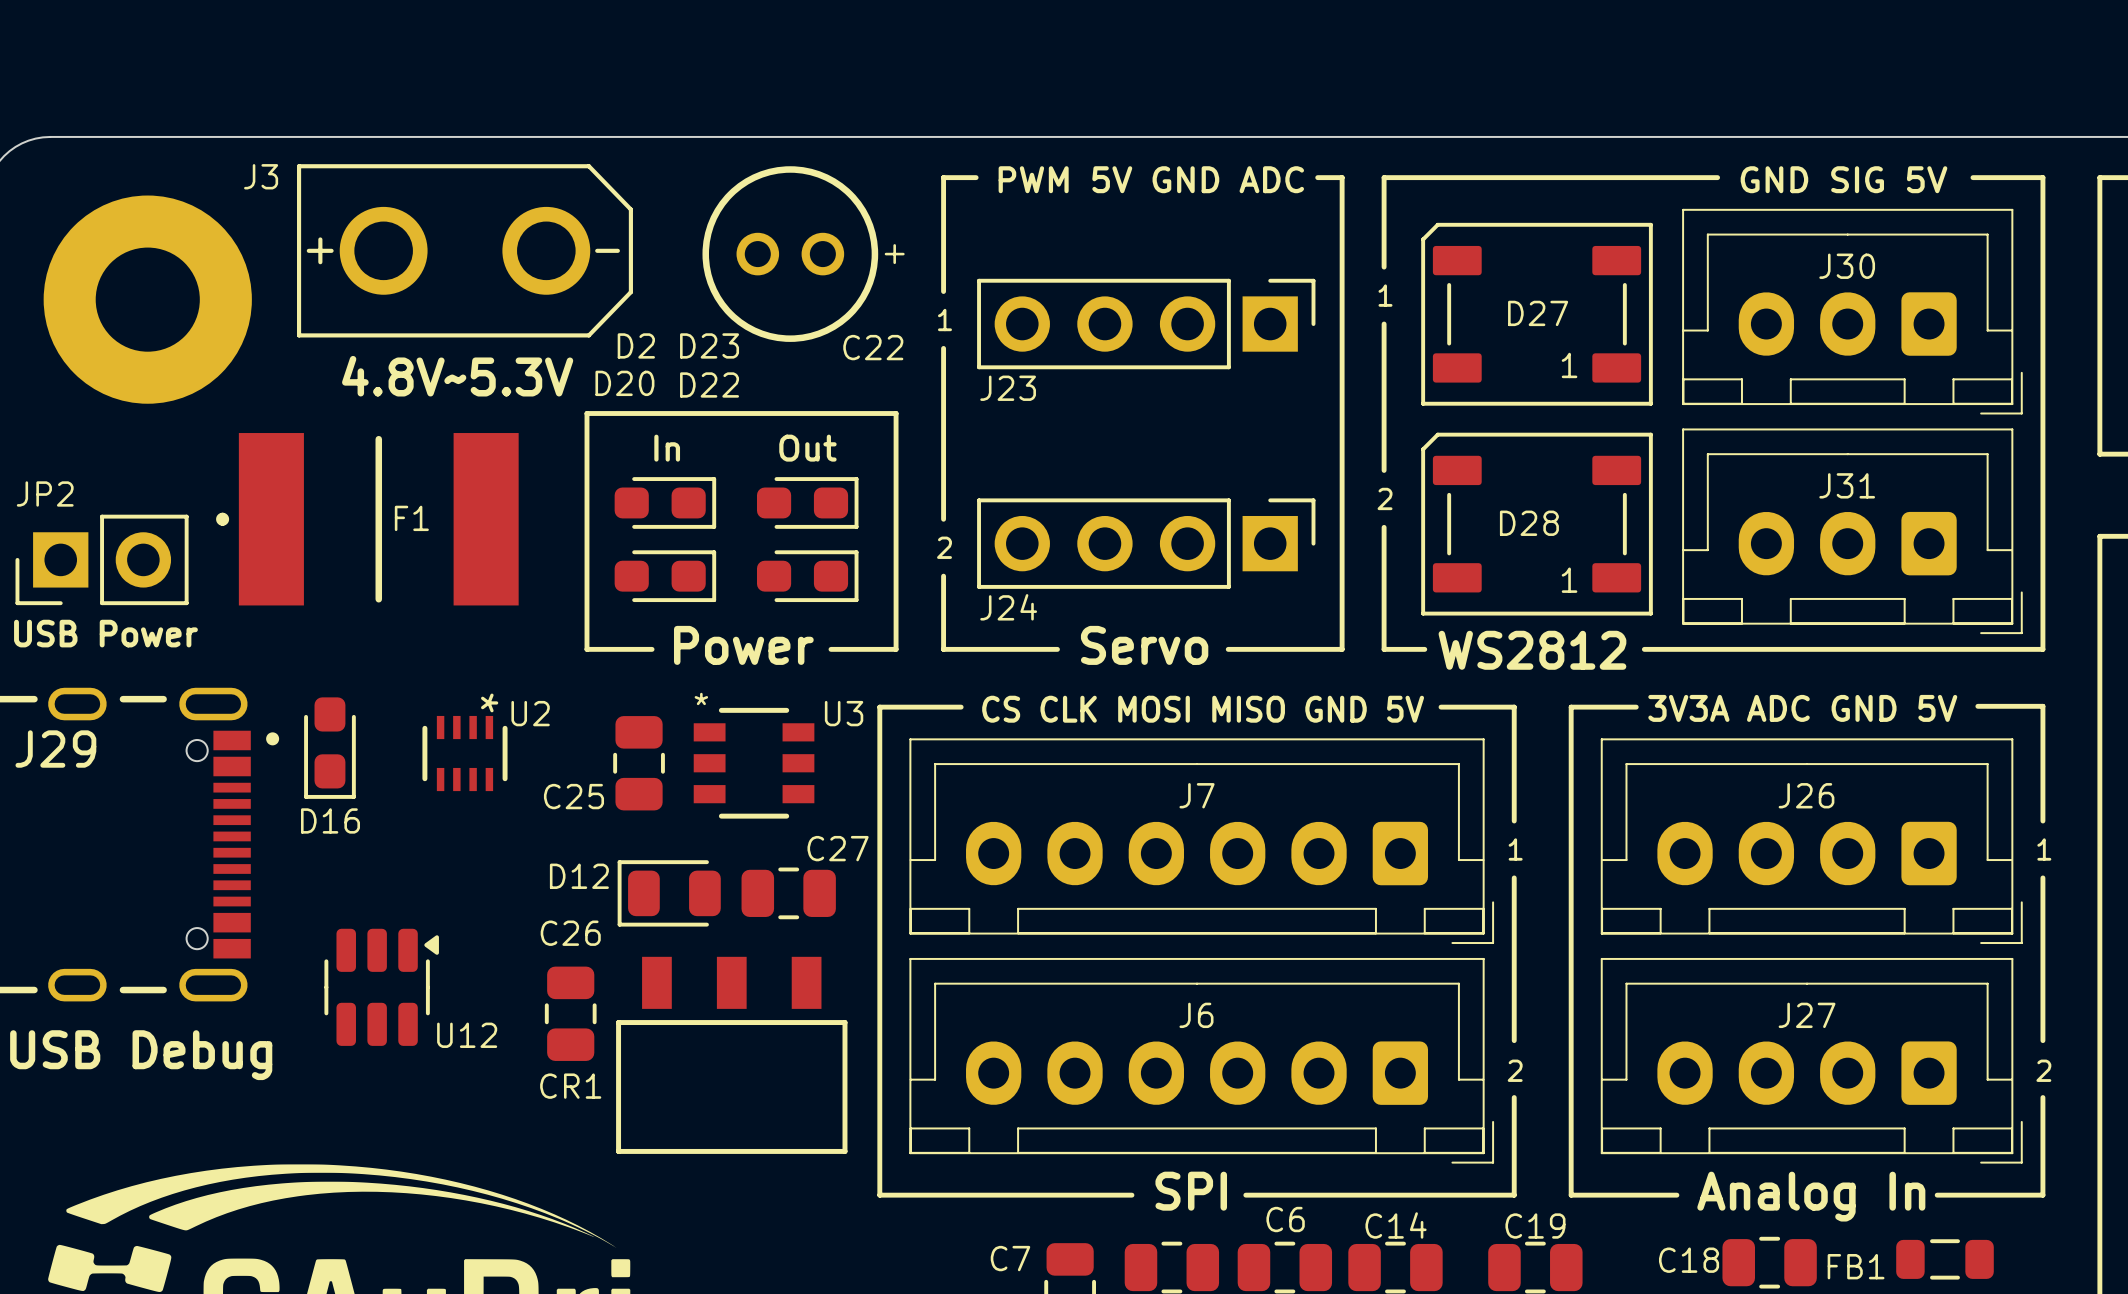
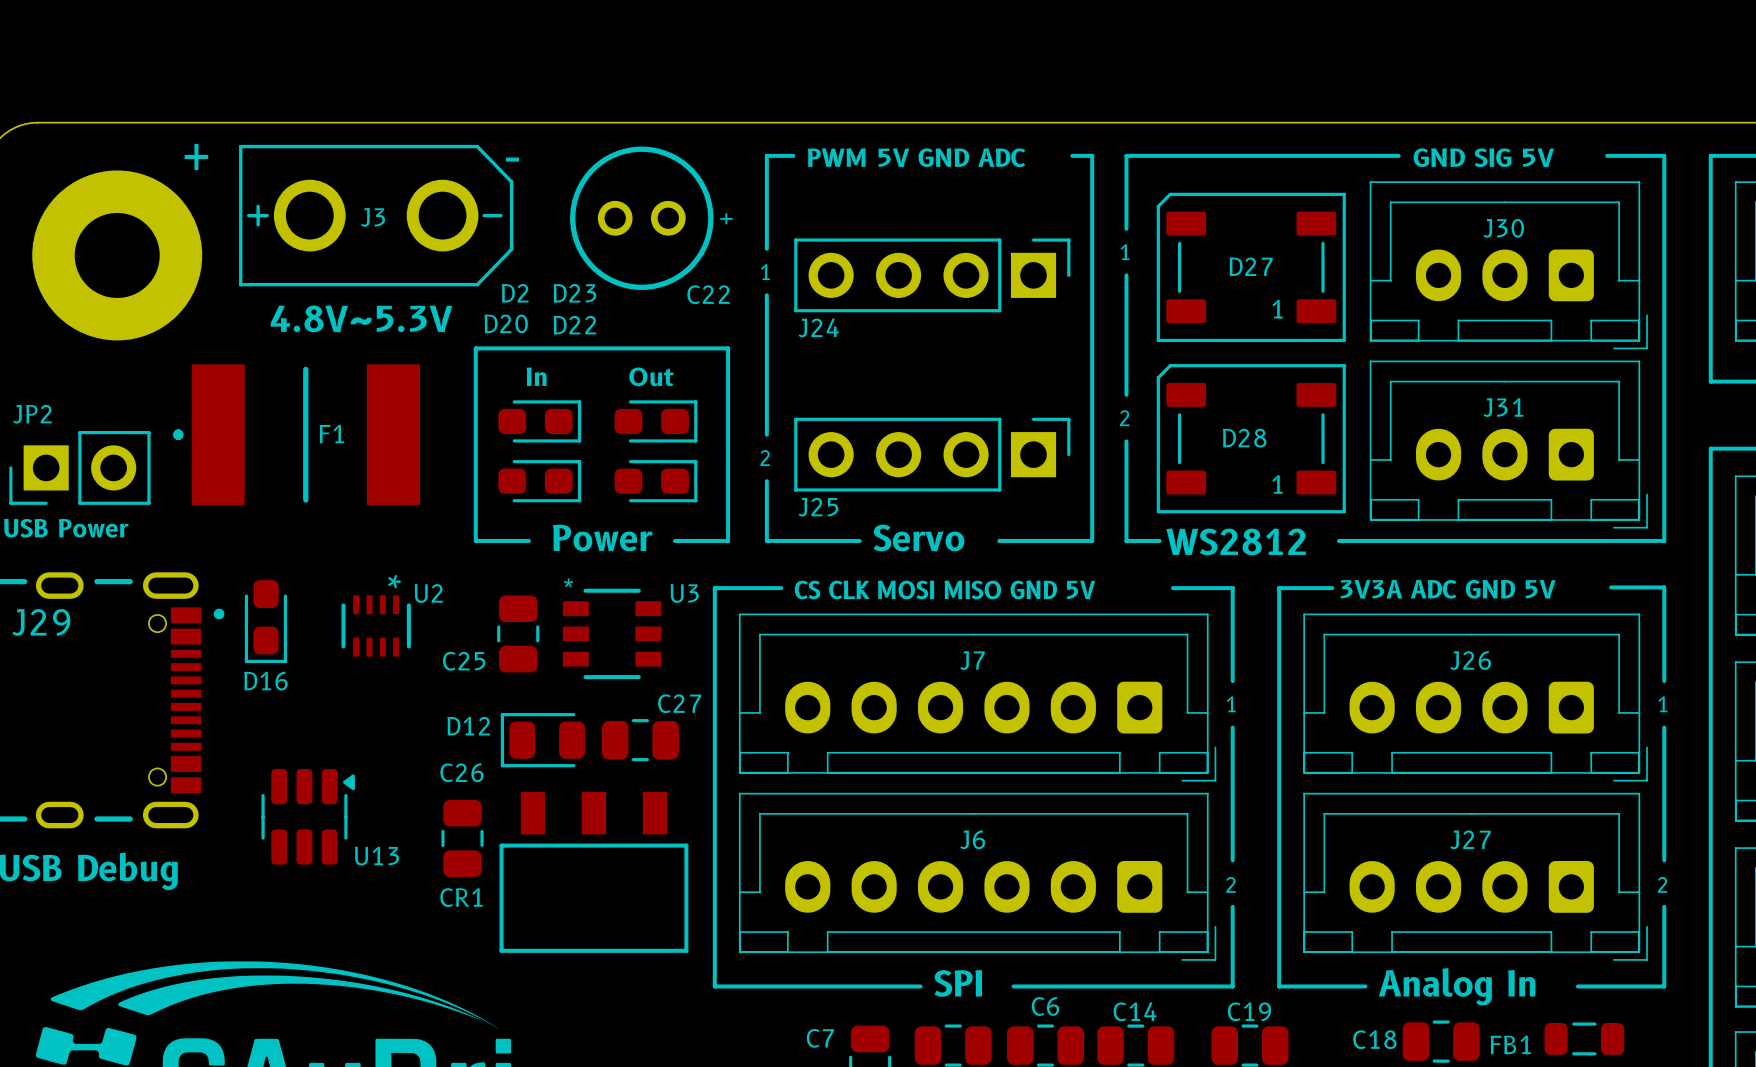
J3 name position: J3 (261, 176) -> J3 (373, 217)
text: none -> + (196, 157)
text: none -> - (512, 159)
J23 name: J23 (1008, 388) -> J24 (818, 327)
J24 name: J24 (1008, 607) -> J25 (818, 507)
U12 name: U12 (467, 1035) -> U13 (376, 856)

